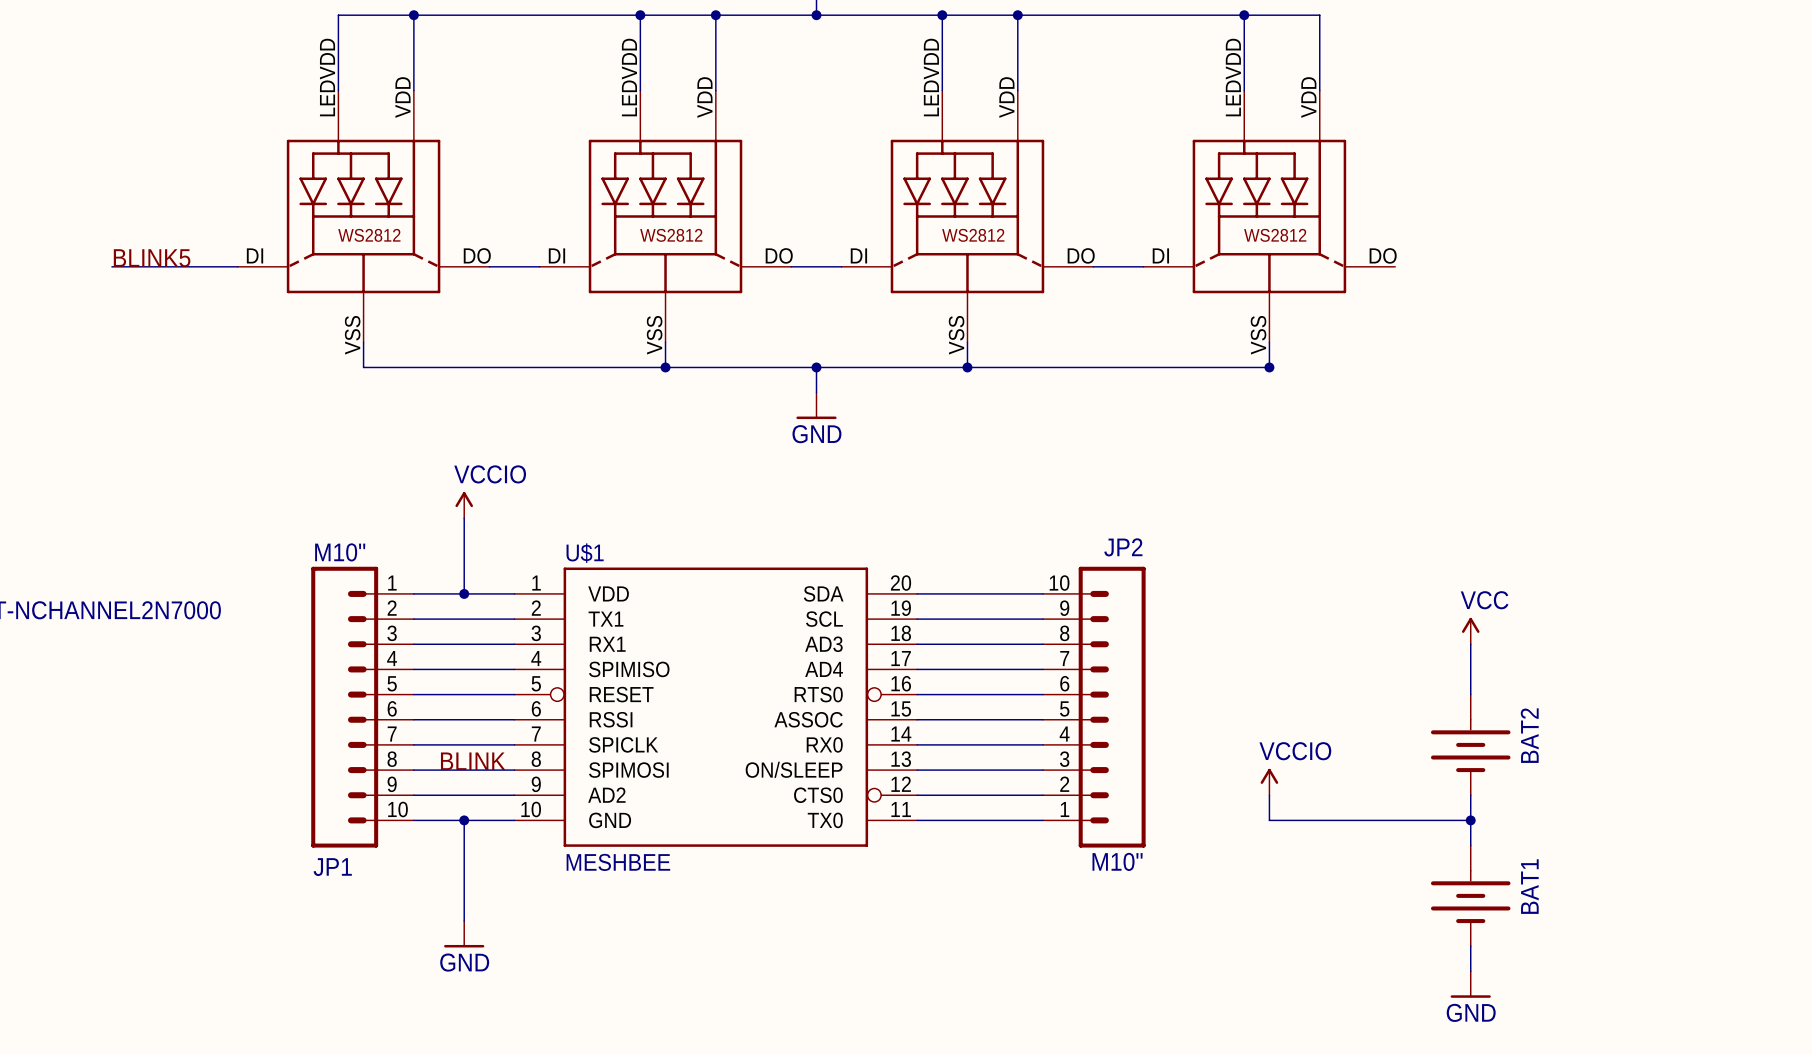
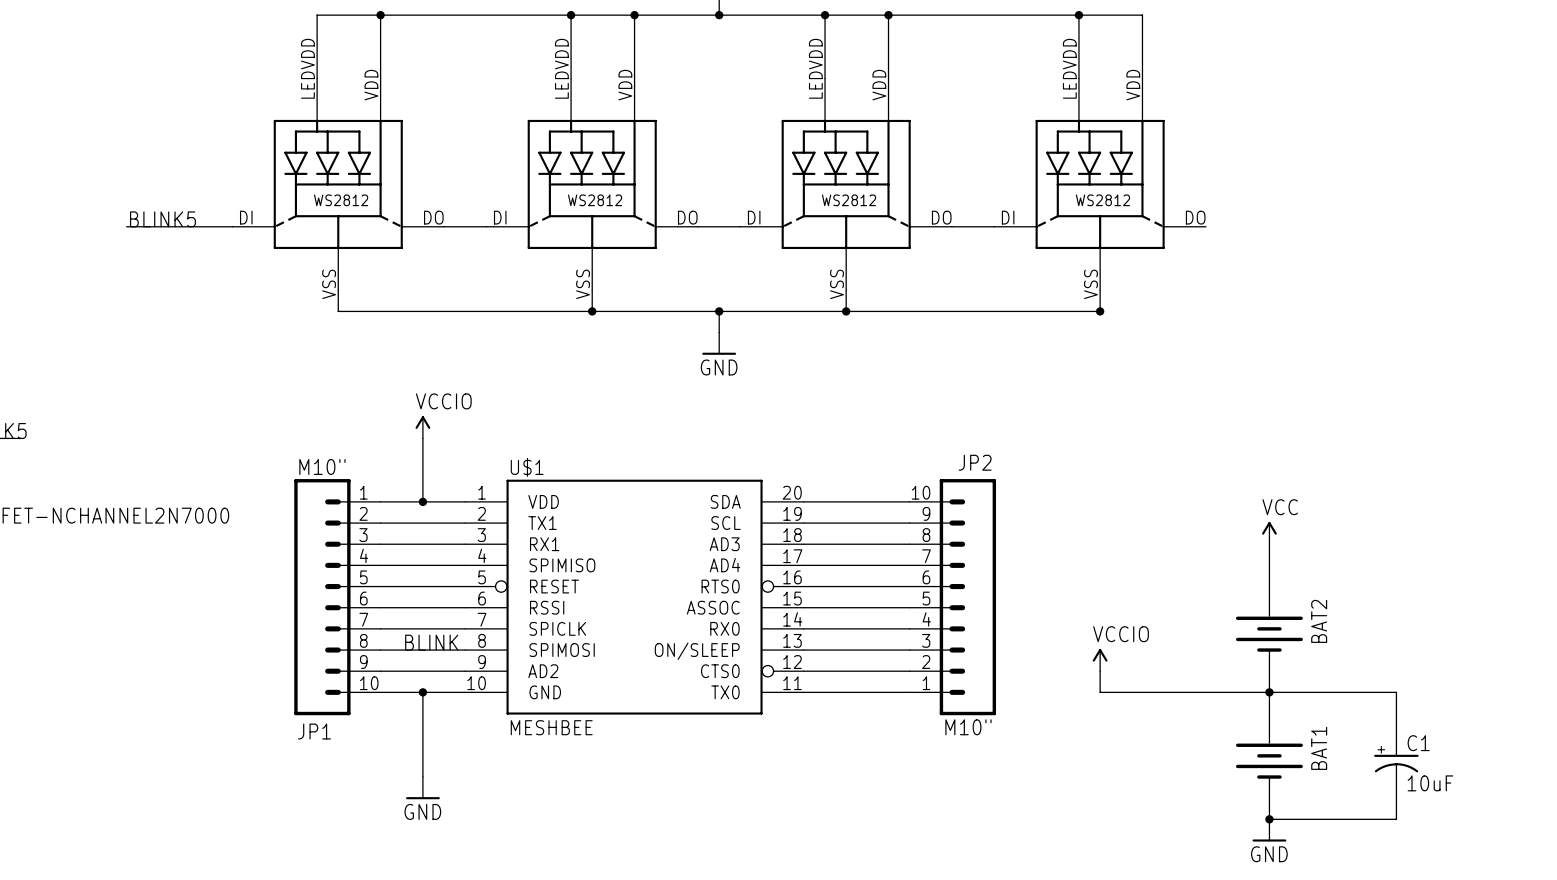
wire: none -> (1269, 692) (1396, 692) (1396, 734)
C1: none -> 10uF (1396, 766)
wire: none -> (1396, 798) (1396, 819) (1269, 819)
junction: none -> (1269, 819)

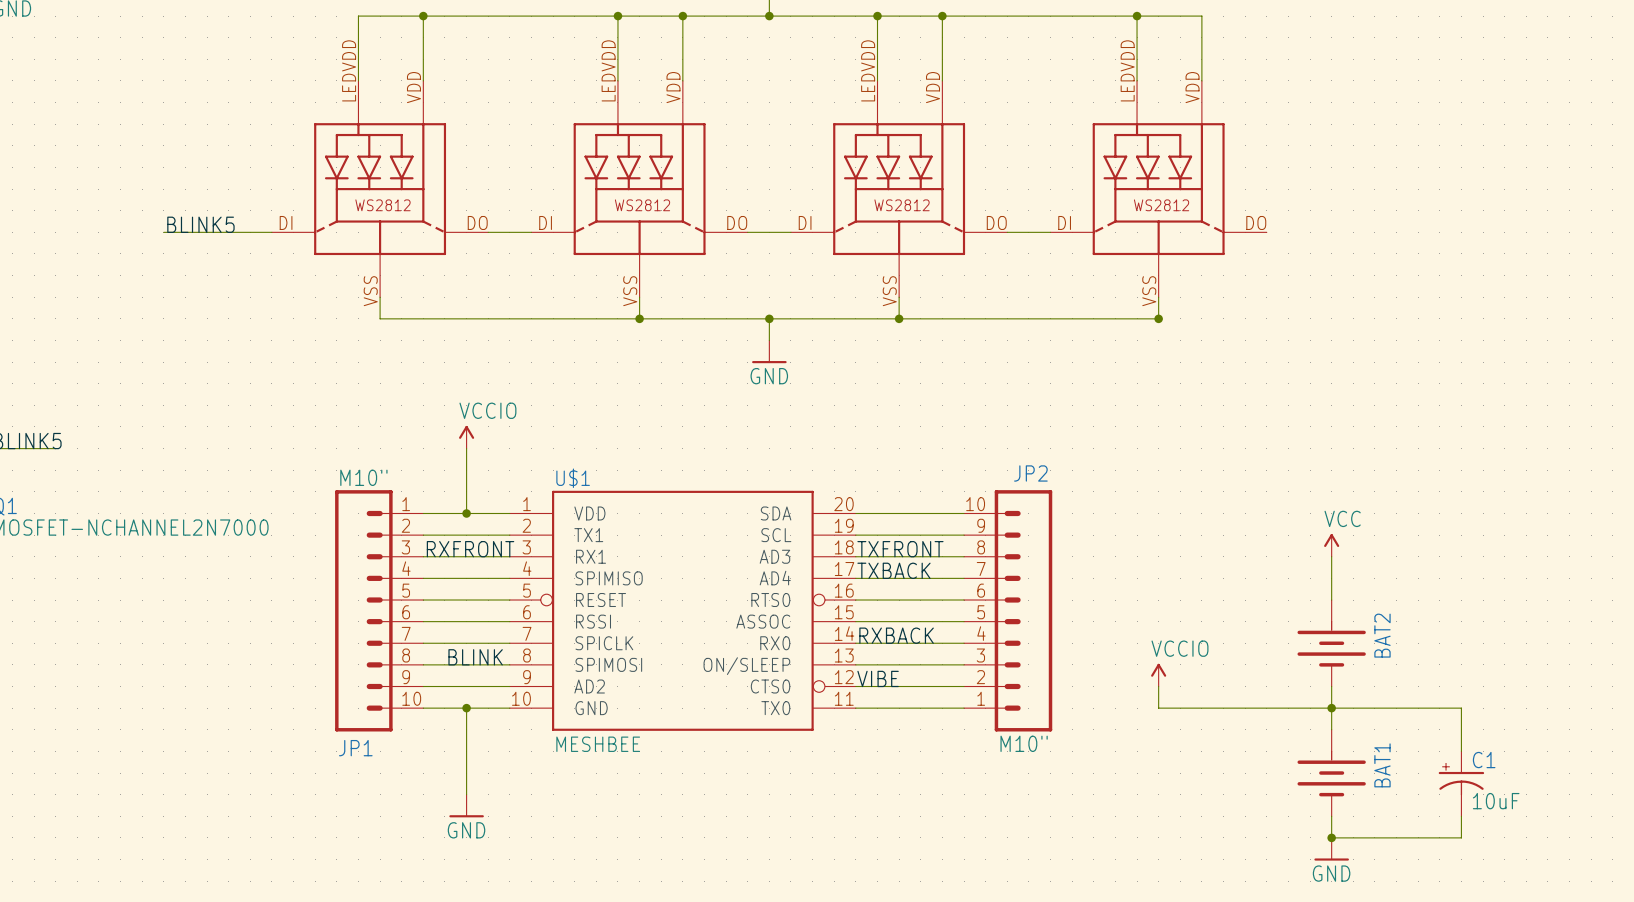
label: none -> RXFRONT (470, 549)
label: none -> TXFRONT (900, 549)
label: none -> TXBACK (893, 570)
label: none -> RXBACK (896, 635)
label: none -> VIBE (878, 678)

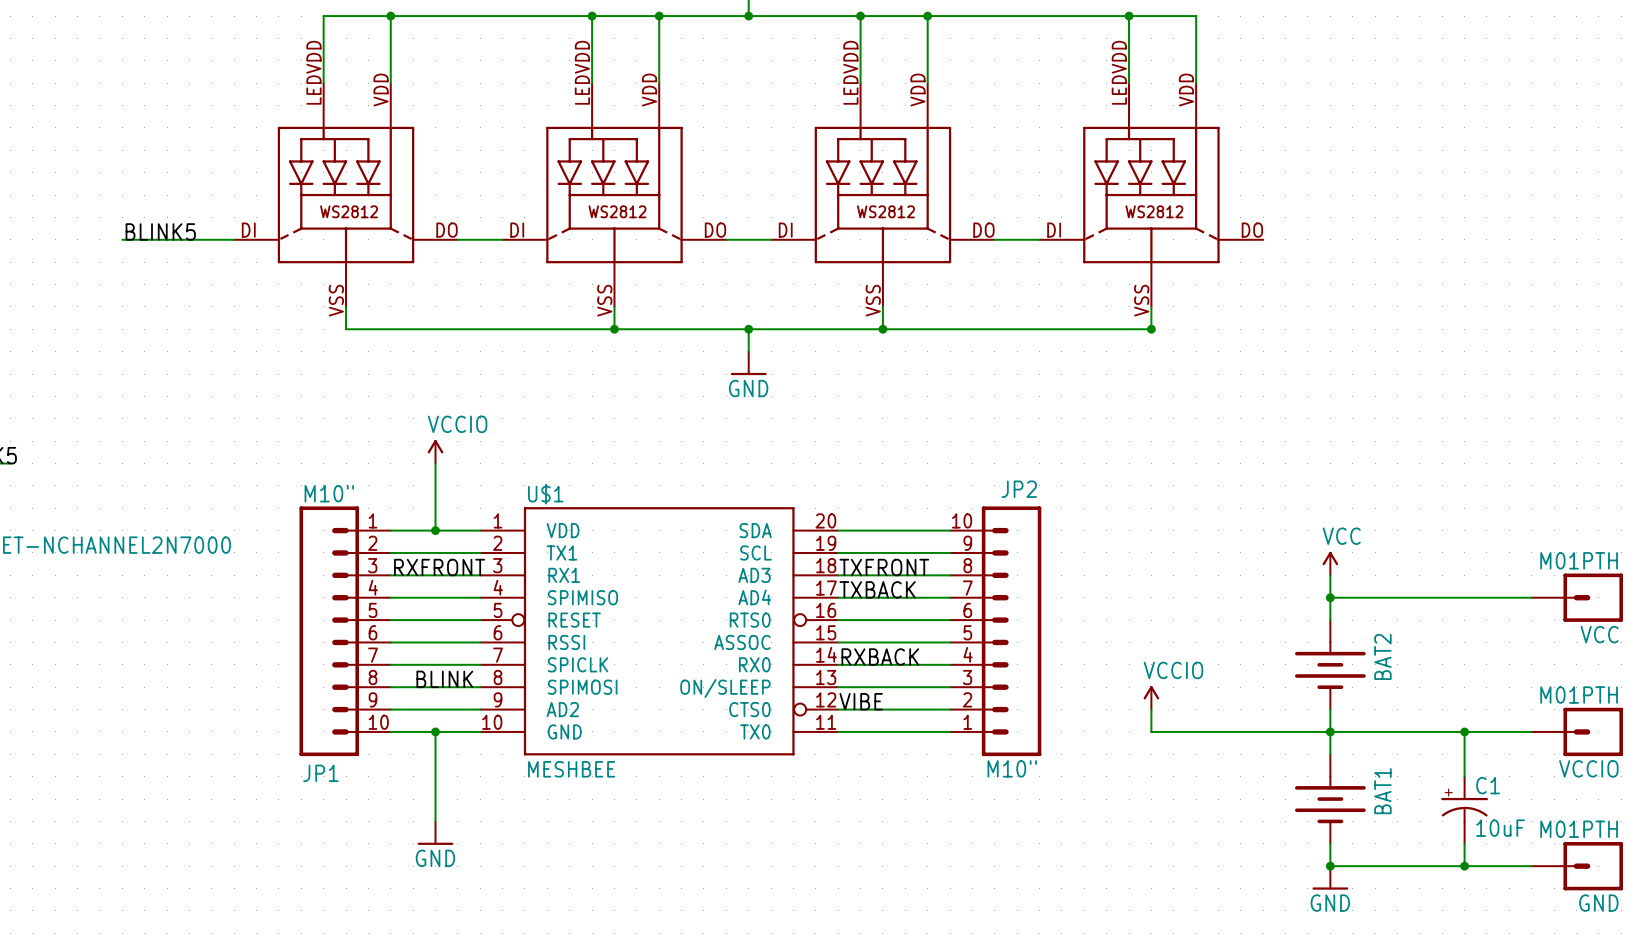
wire: none -> (1330, 597) (1531, 597)
junction: none -> (1330, 597)
VCC: none -> M01PTH (1577, 597)
wire: none -> (1464, 731) (1531, 731)
junction: none -> (1464, 731)
VCCIO: none -> M01PTH (1577, 731)
wire: none -> (1464, 866) (1531, 866)
junction: none -> (1464, 866)
GND: none -> M01PTH (1577, 866)

